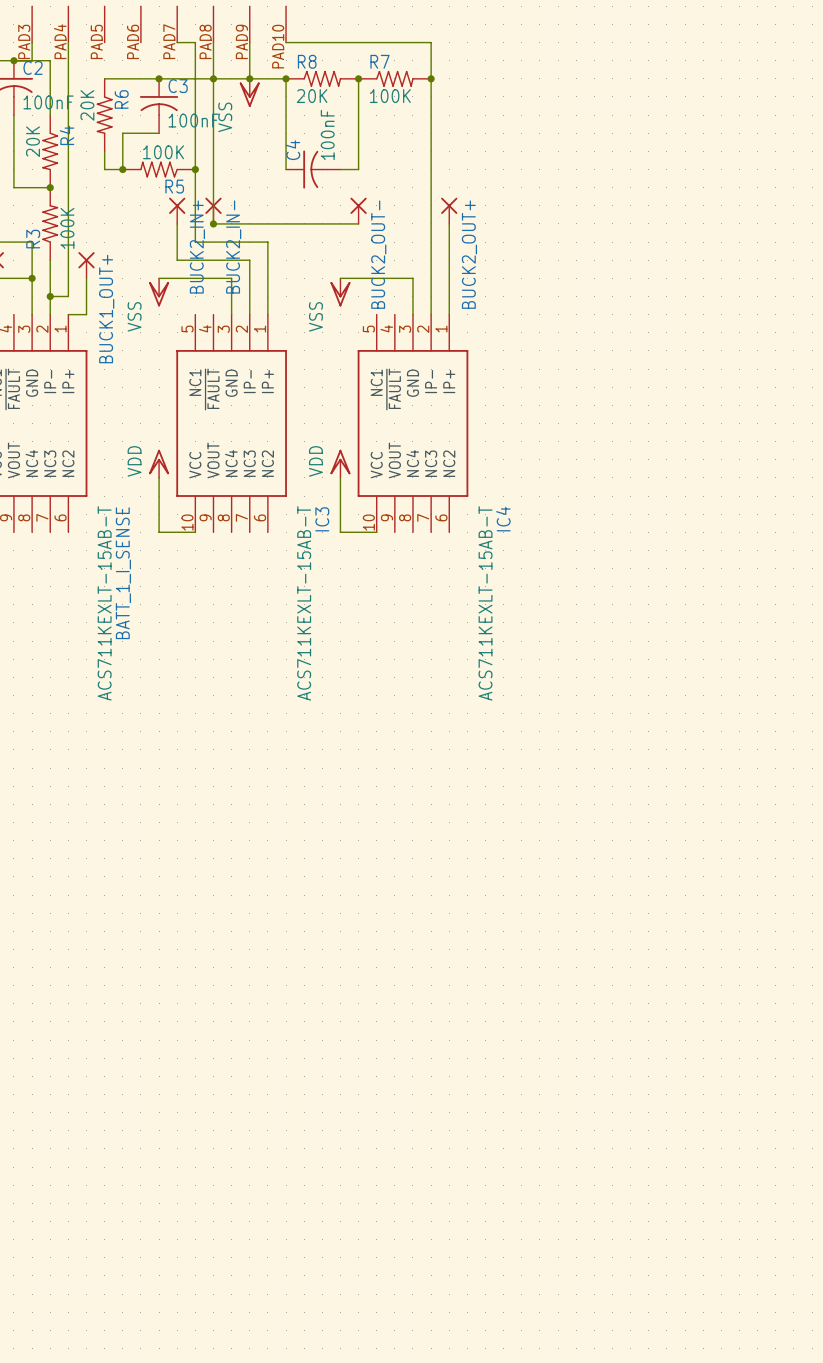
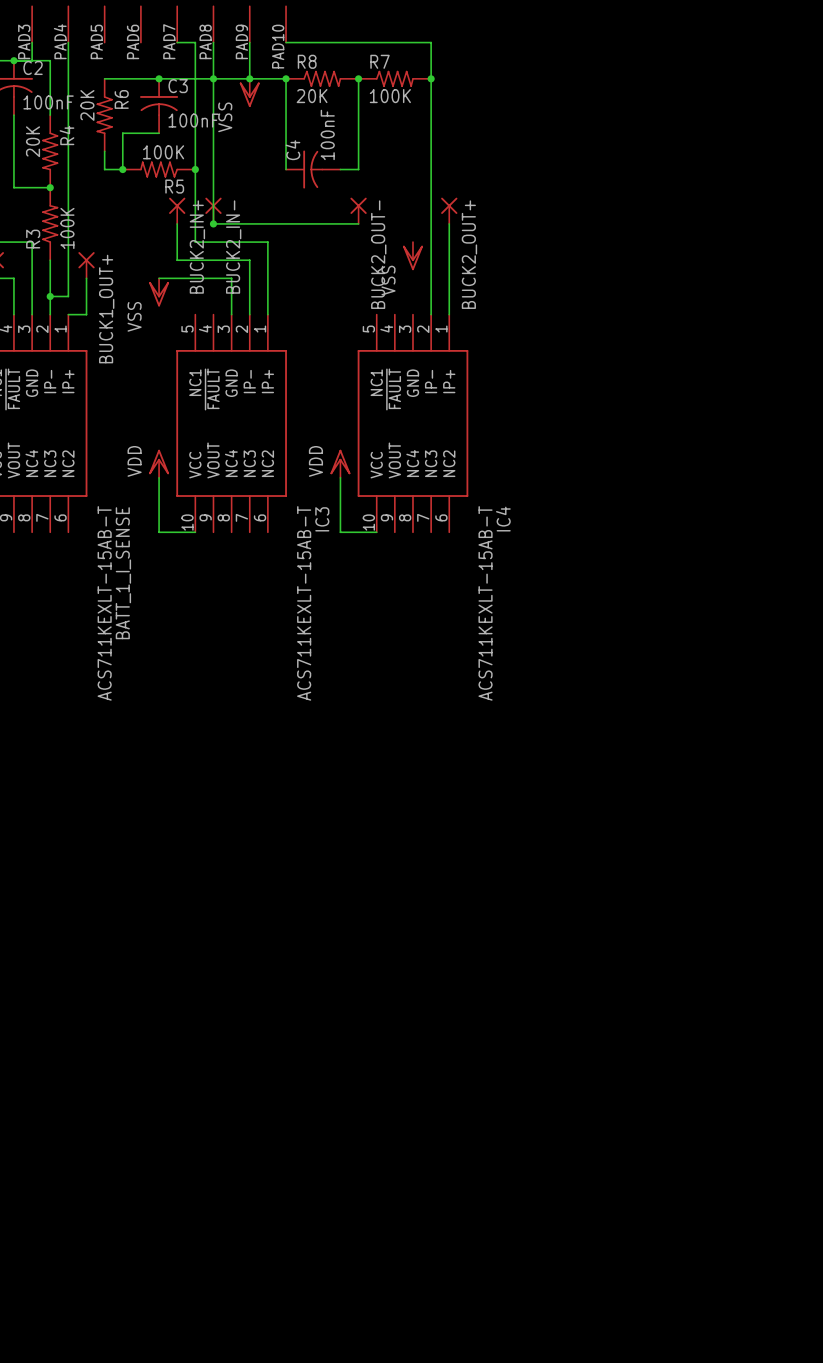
wire: (13, 278) (32, 278) -> (13, 278) (13, 314)
junction: (32, 278) -> none
wire: (340, 278) (412, 278) (412, 314) -> none
power symbol position: VSS (340, 292) -> VSS (412, 256)

